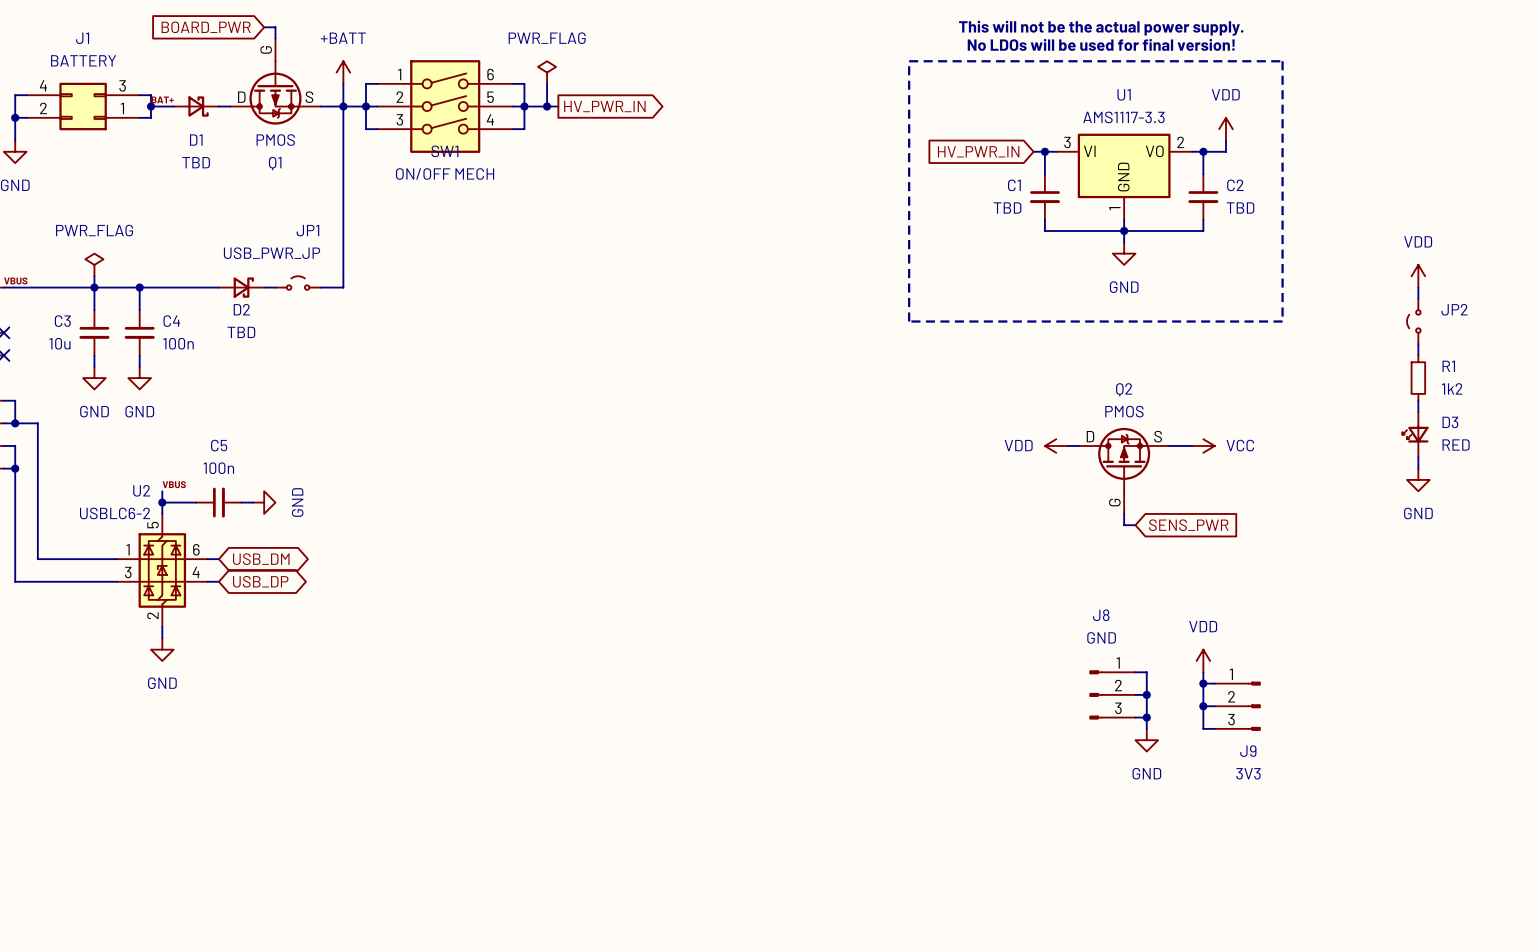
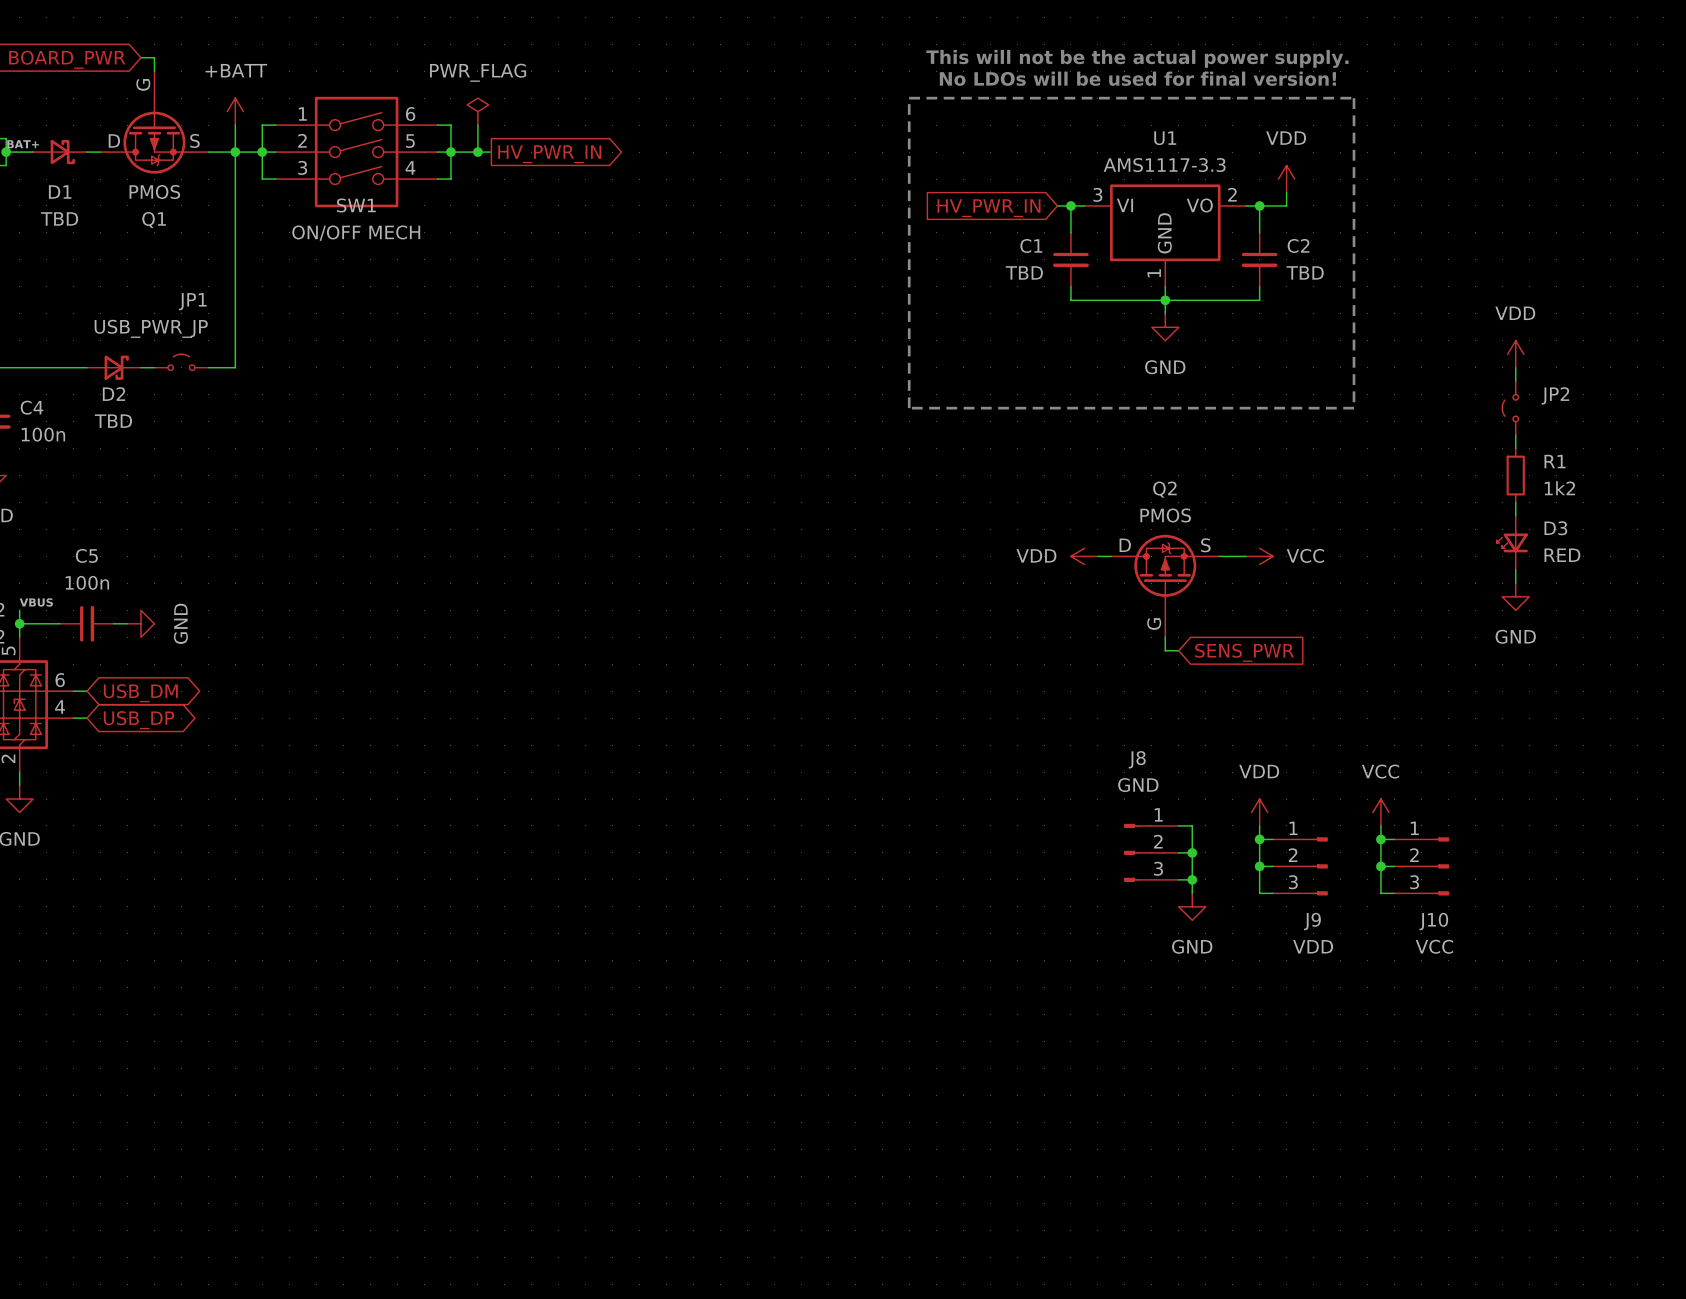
power symbol: none -> VCC (1380, 812)
wire: none -> (1380, 825) (1380, 893) (1394, 893)
wire: none -> (1380, 839) (1394, 839)
junction: none -> (1380, 839)
wire: none -> (1380, 866) (1394, 866)
junction: none -> (1380, 866)
J10: none -> VCC (1421, 866)
J9 value: 3V3 (1248, 773) -> VDD (1313, 946)

